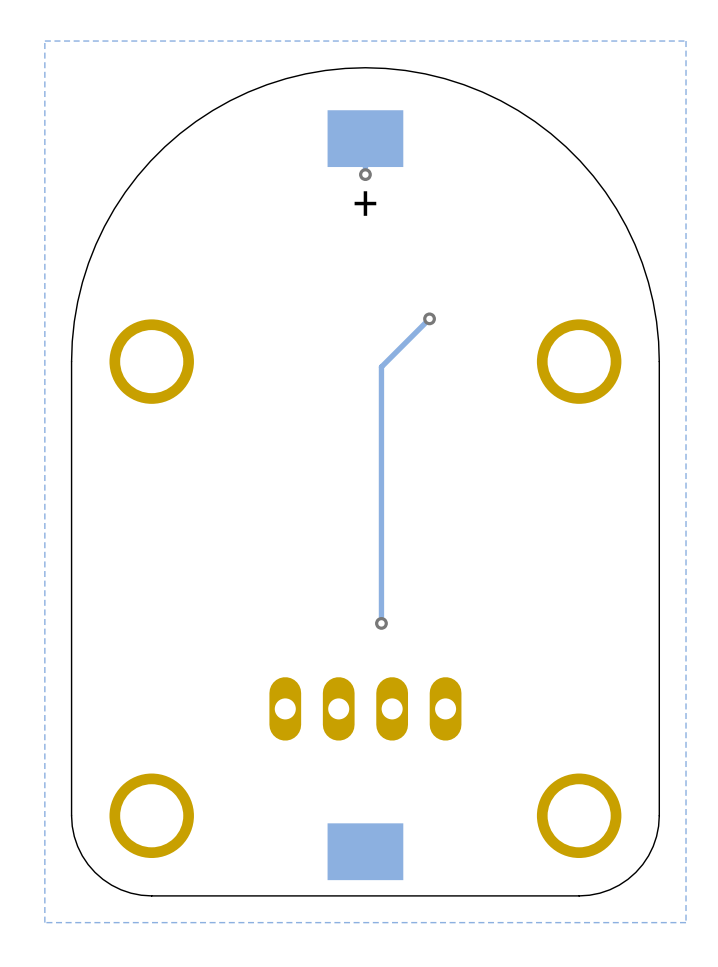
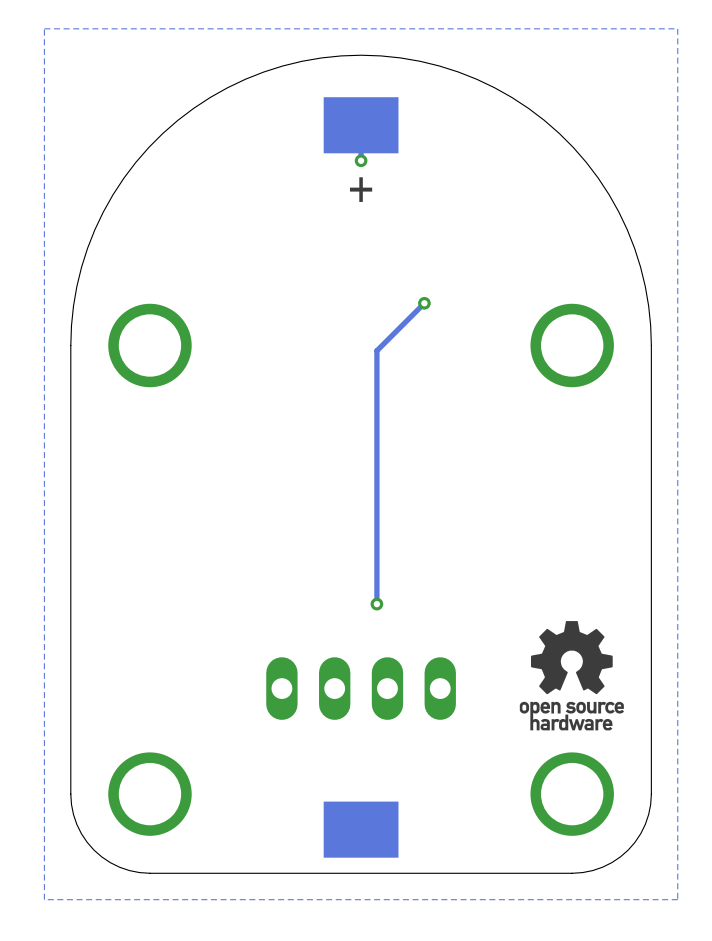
drawing: none -> [519, 621, 624, 731]

